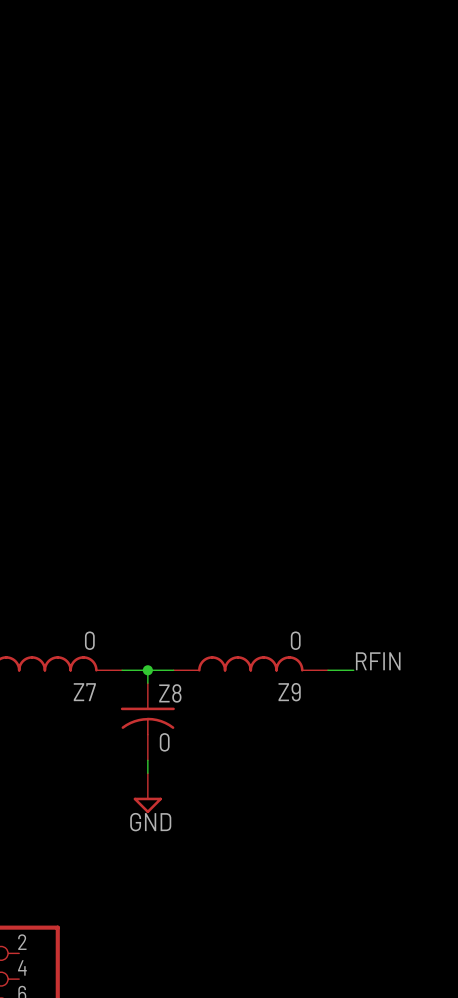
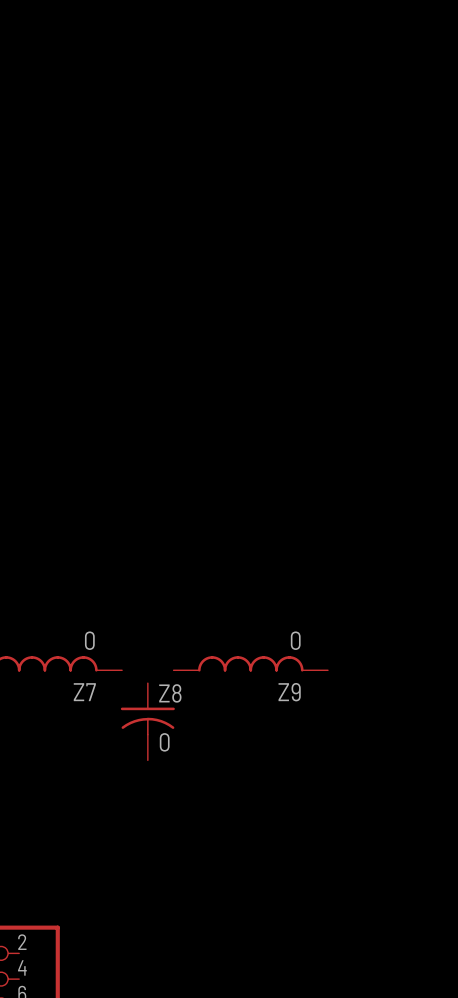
label: RFIN (378, 661) -> none
wire: (122, 670) (173, 670) -> none
wire: (147, 670) (147, 683) -> none
junction: (147, 670) -> none
wire: (327, 670) (353, 670) -> none
wire: (147, 760) (147, 773) -> none
power symbol: GND (147, 793) -> none

